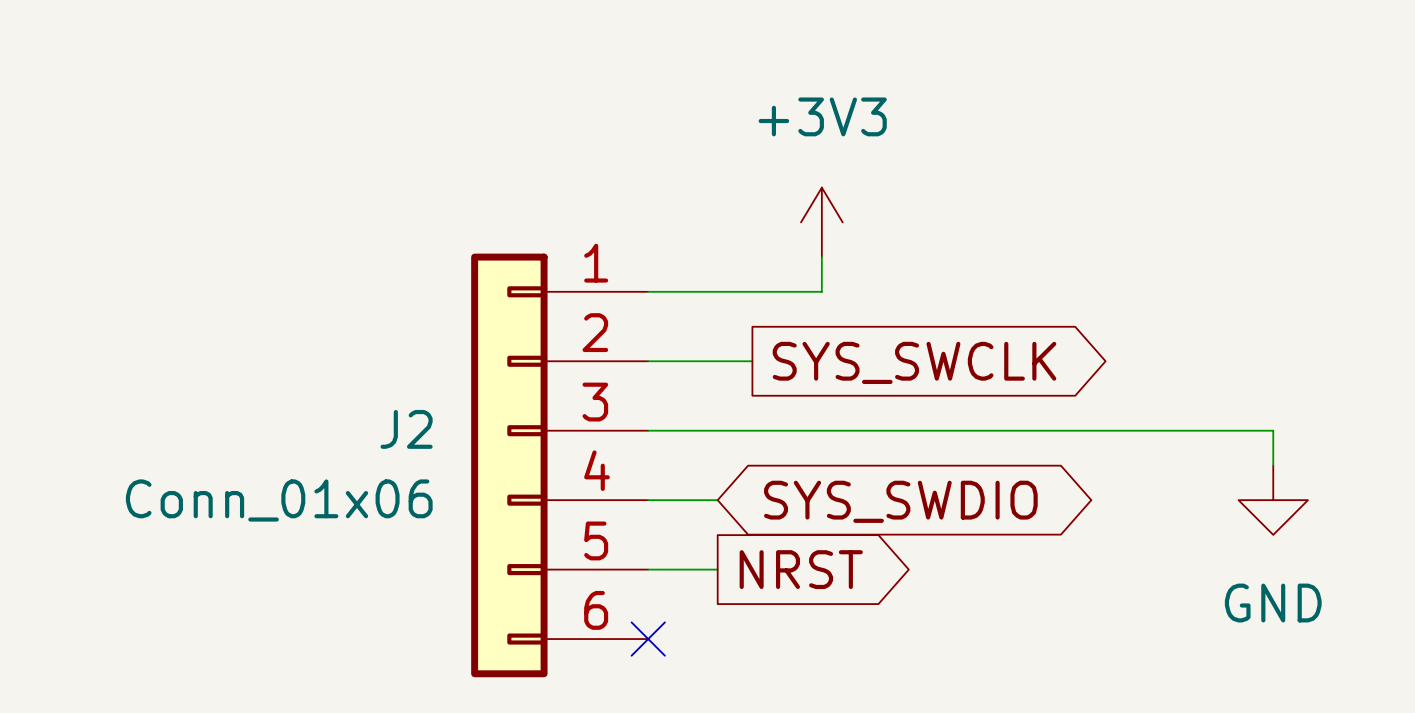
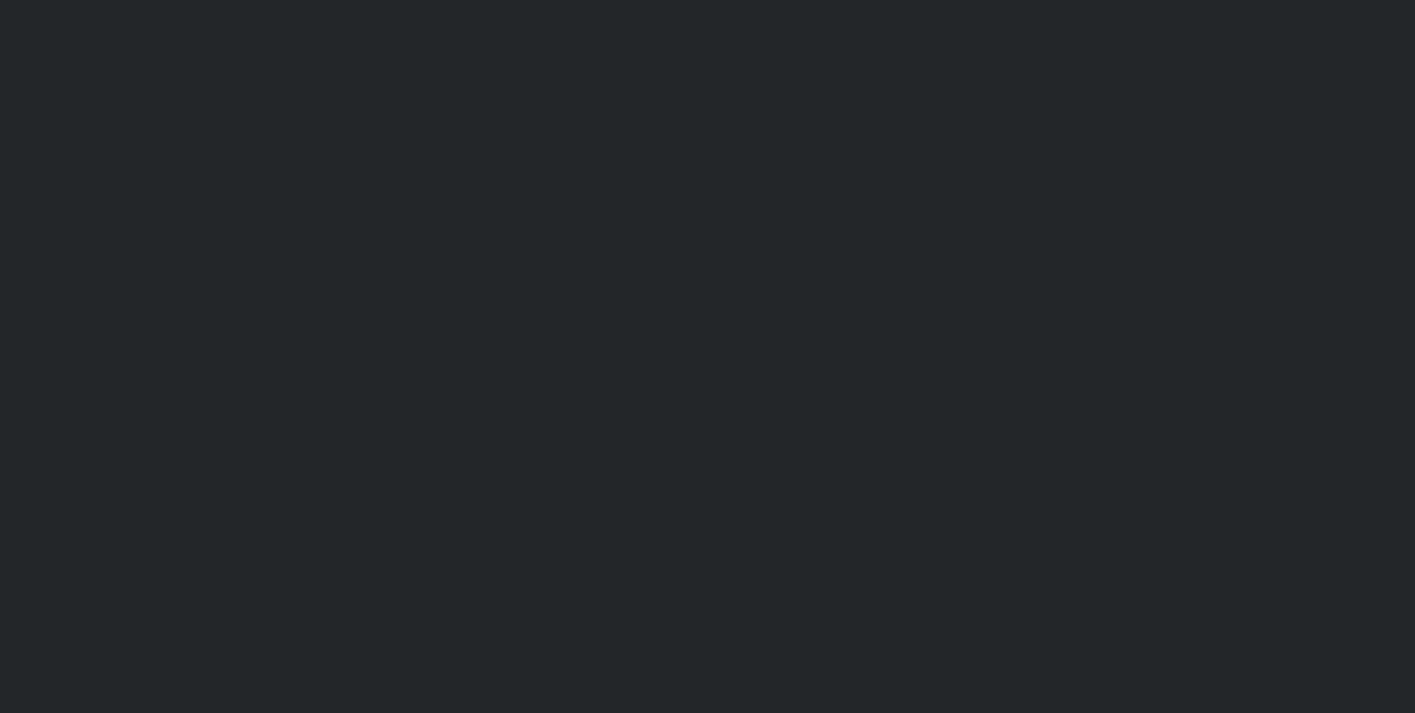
power symbol: +3V3 (821, 222) -> none
wire: (821, 257) (821, 291) (648, 291) -> none
wire: (648, 361) (752, 361) -> none
global label: SYS_SWCLK (914, 362) -> none
wire: (648, 430) (1273, 430) (1273, 465) -> none
J2: Conn_01x06 (559, 465) -> none
wire: (648, 500) (717, 500) -> none
power symbol: GND (1273, 500) -> none
global label: SYS_SWDIO (900, 501) -> none
wire: (648, 569) (717, 569) -> none
global label: NRST (801, 569) -> none
no-connect mark: (648, 639) -> none

